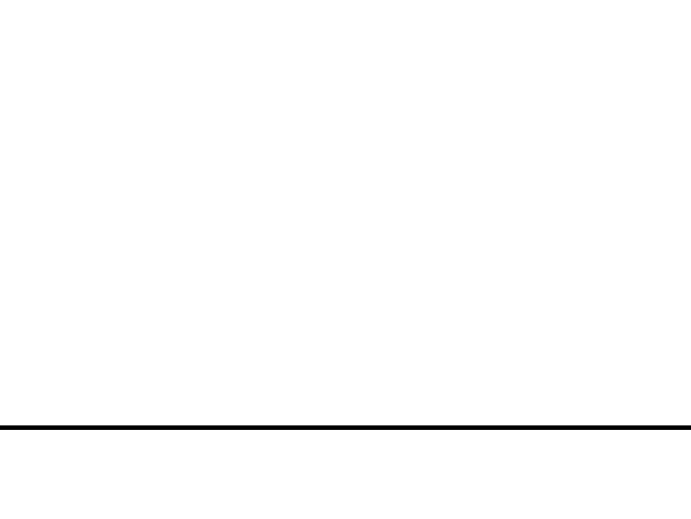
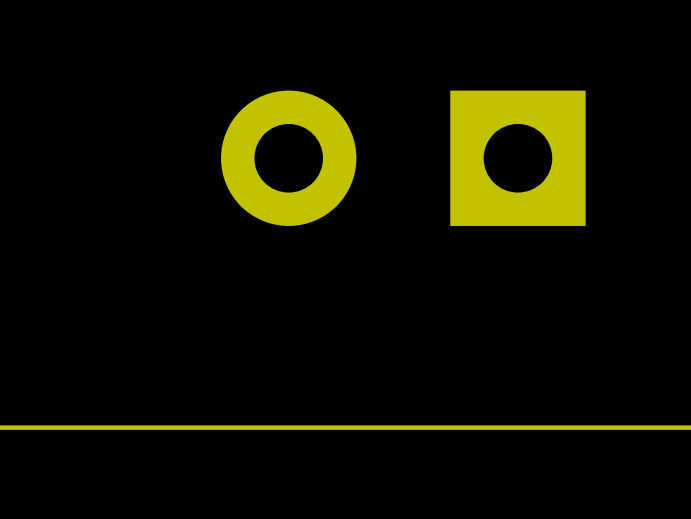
part: none -> (403, 158)

